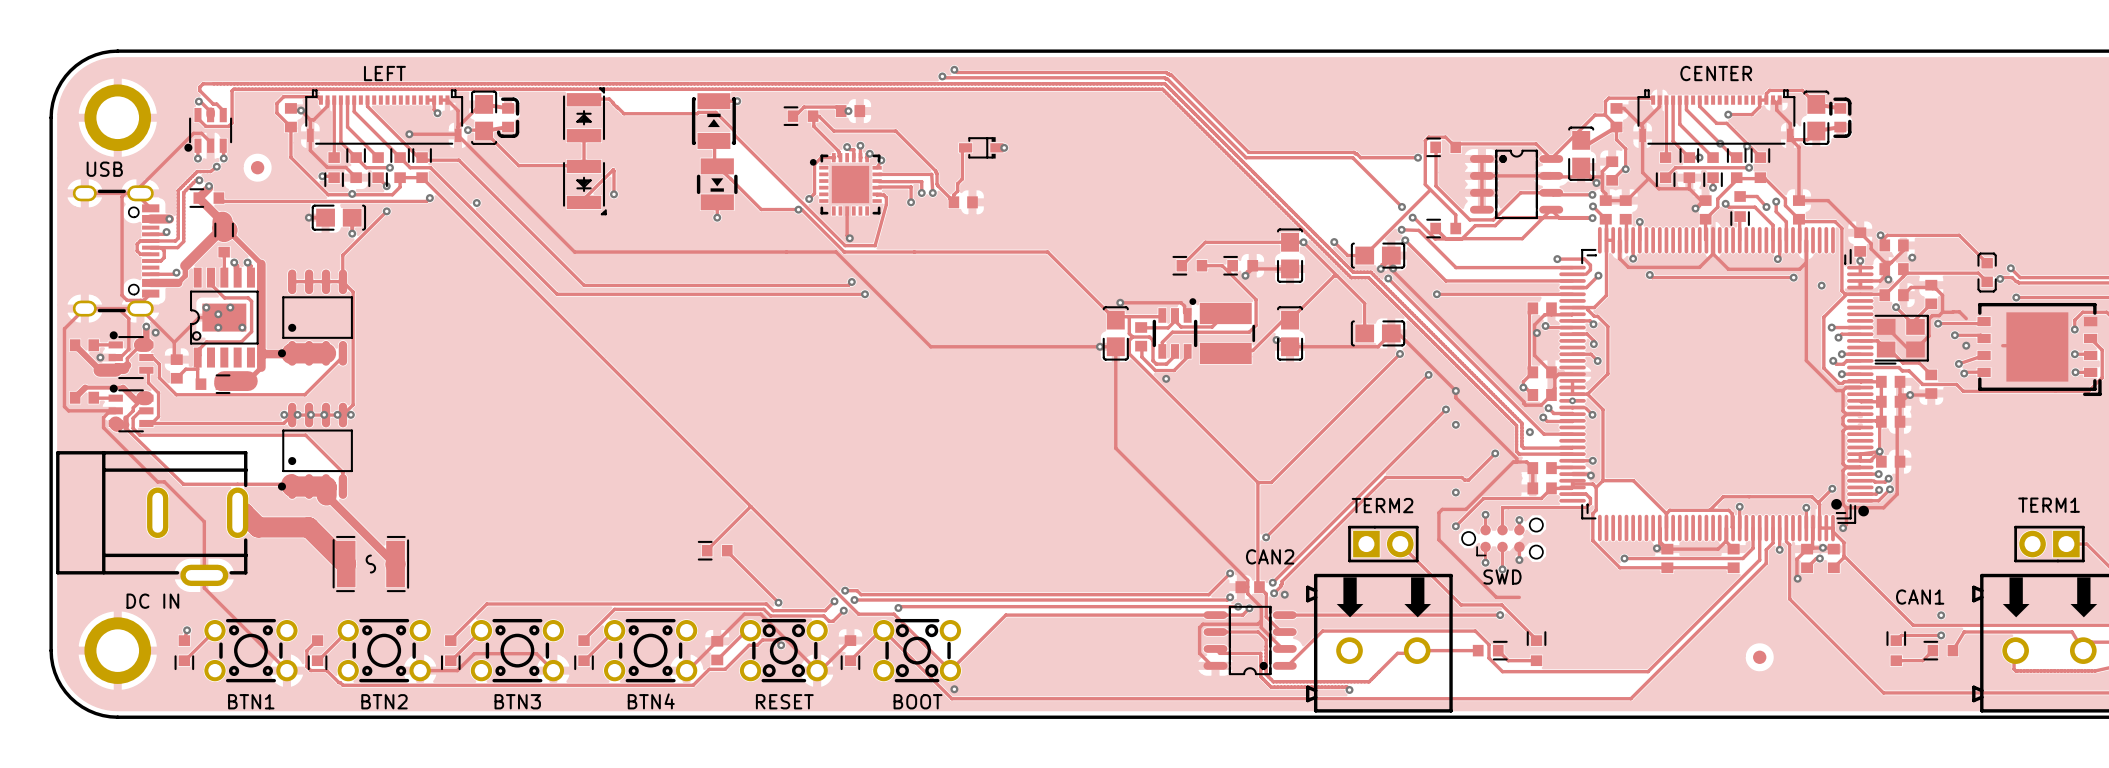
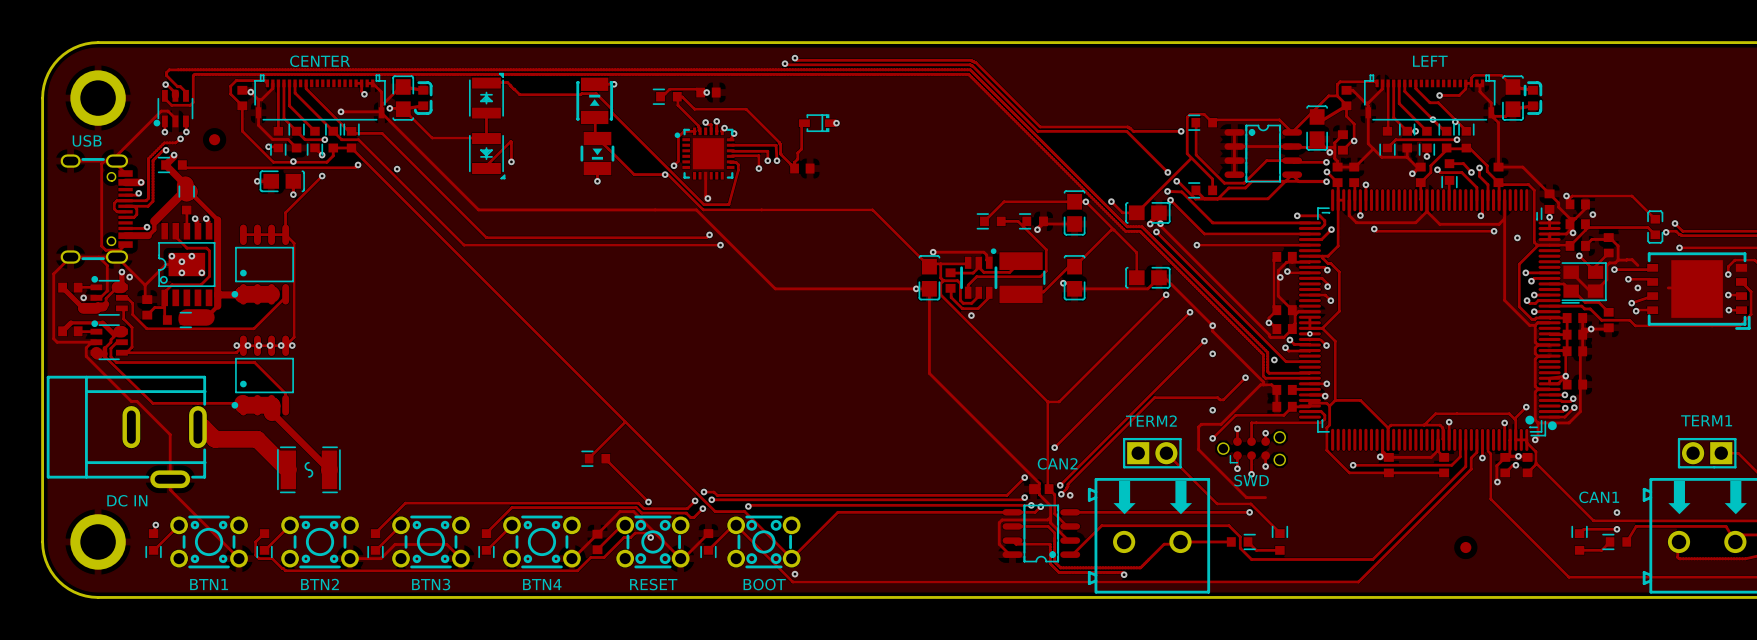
text: LEFT (384, 73) -> CENTER (320, 61)
text: CENTER (1716, 73) -> LEFT (1430, 61)

